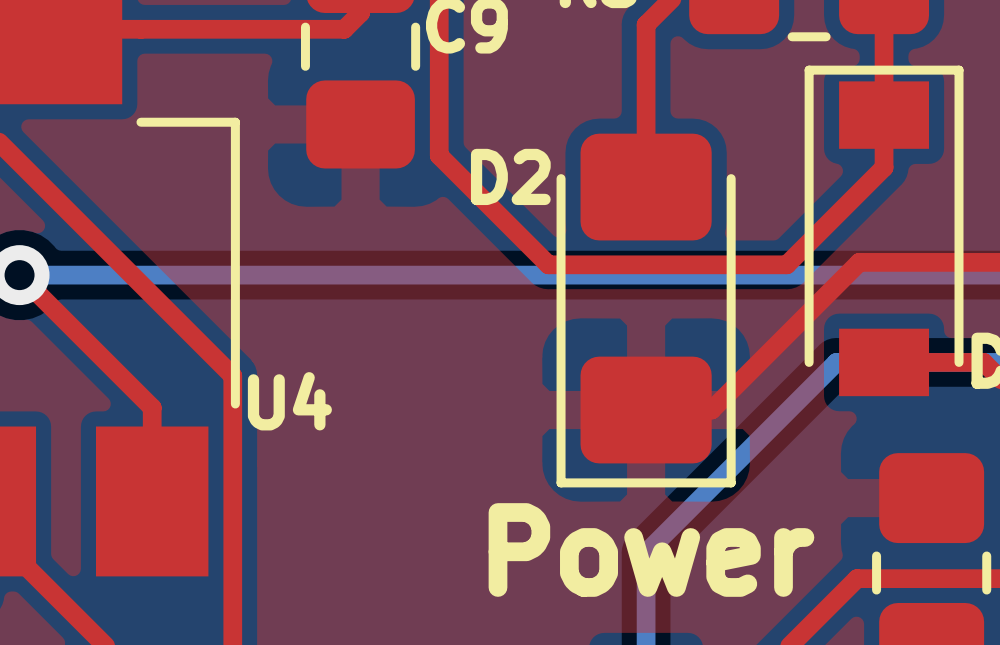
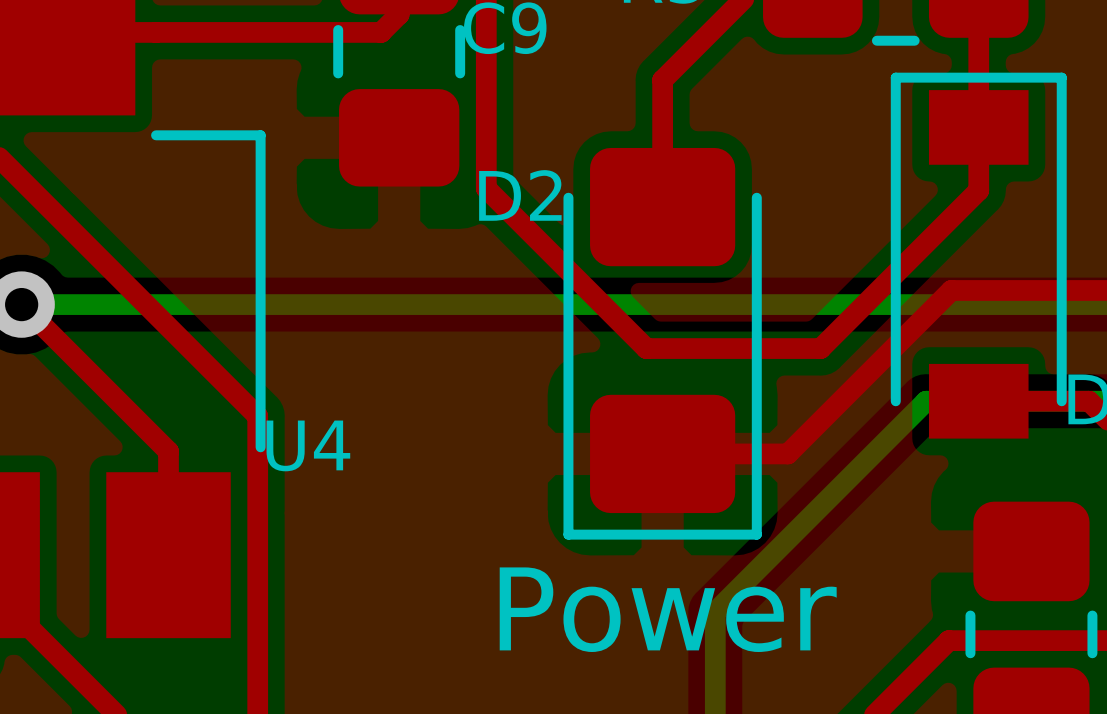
top track: (646, 24) (646, 187) -> (715, 27) (662, 80) (662, 207)
top track: (439, 155) (548, 264) (786, 264) (884, 167) -> (486, 172) (486, 188) (646, 348) (820, 348) (978, 190) (978, 185)
D2 position: (646, 310) -> (662, 343)
text position: Power (651, 549) -> Power (668, 609)

